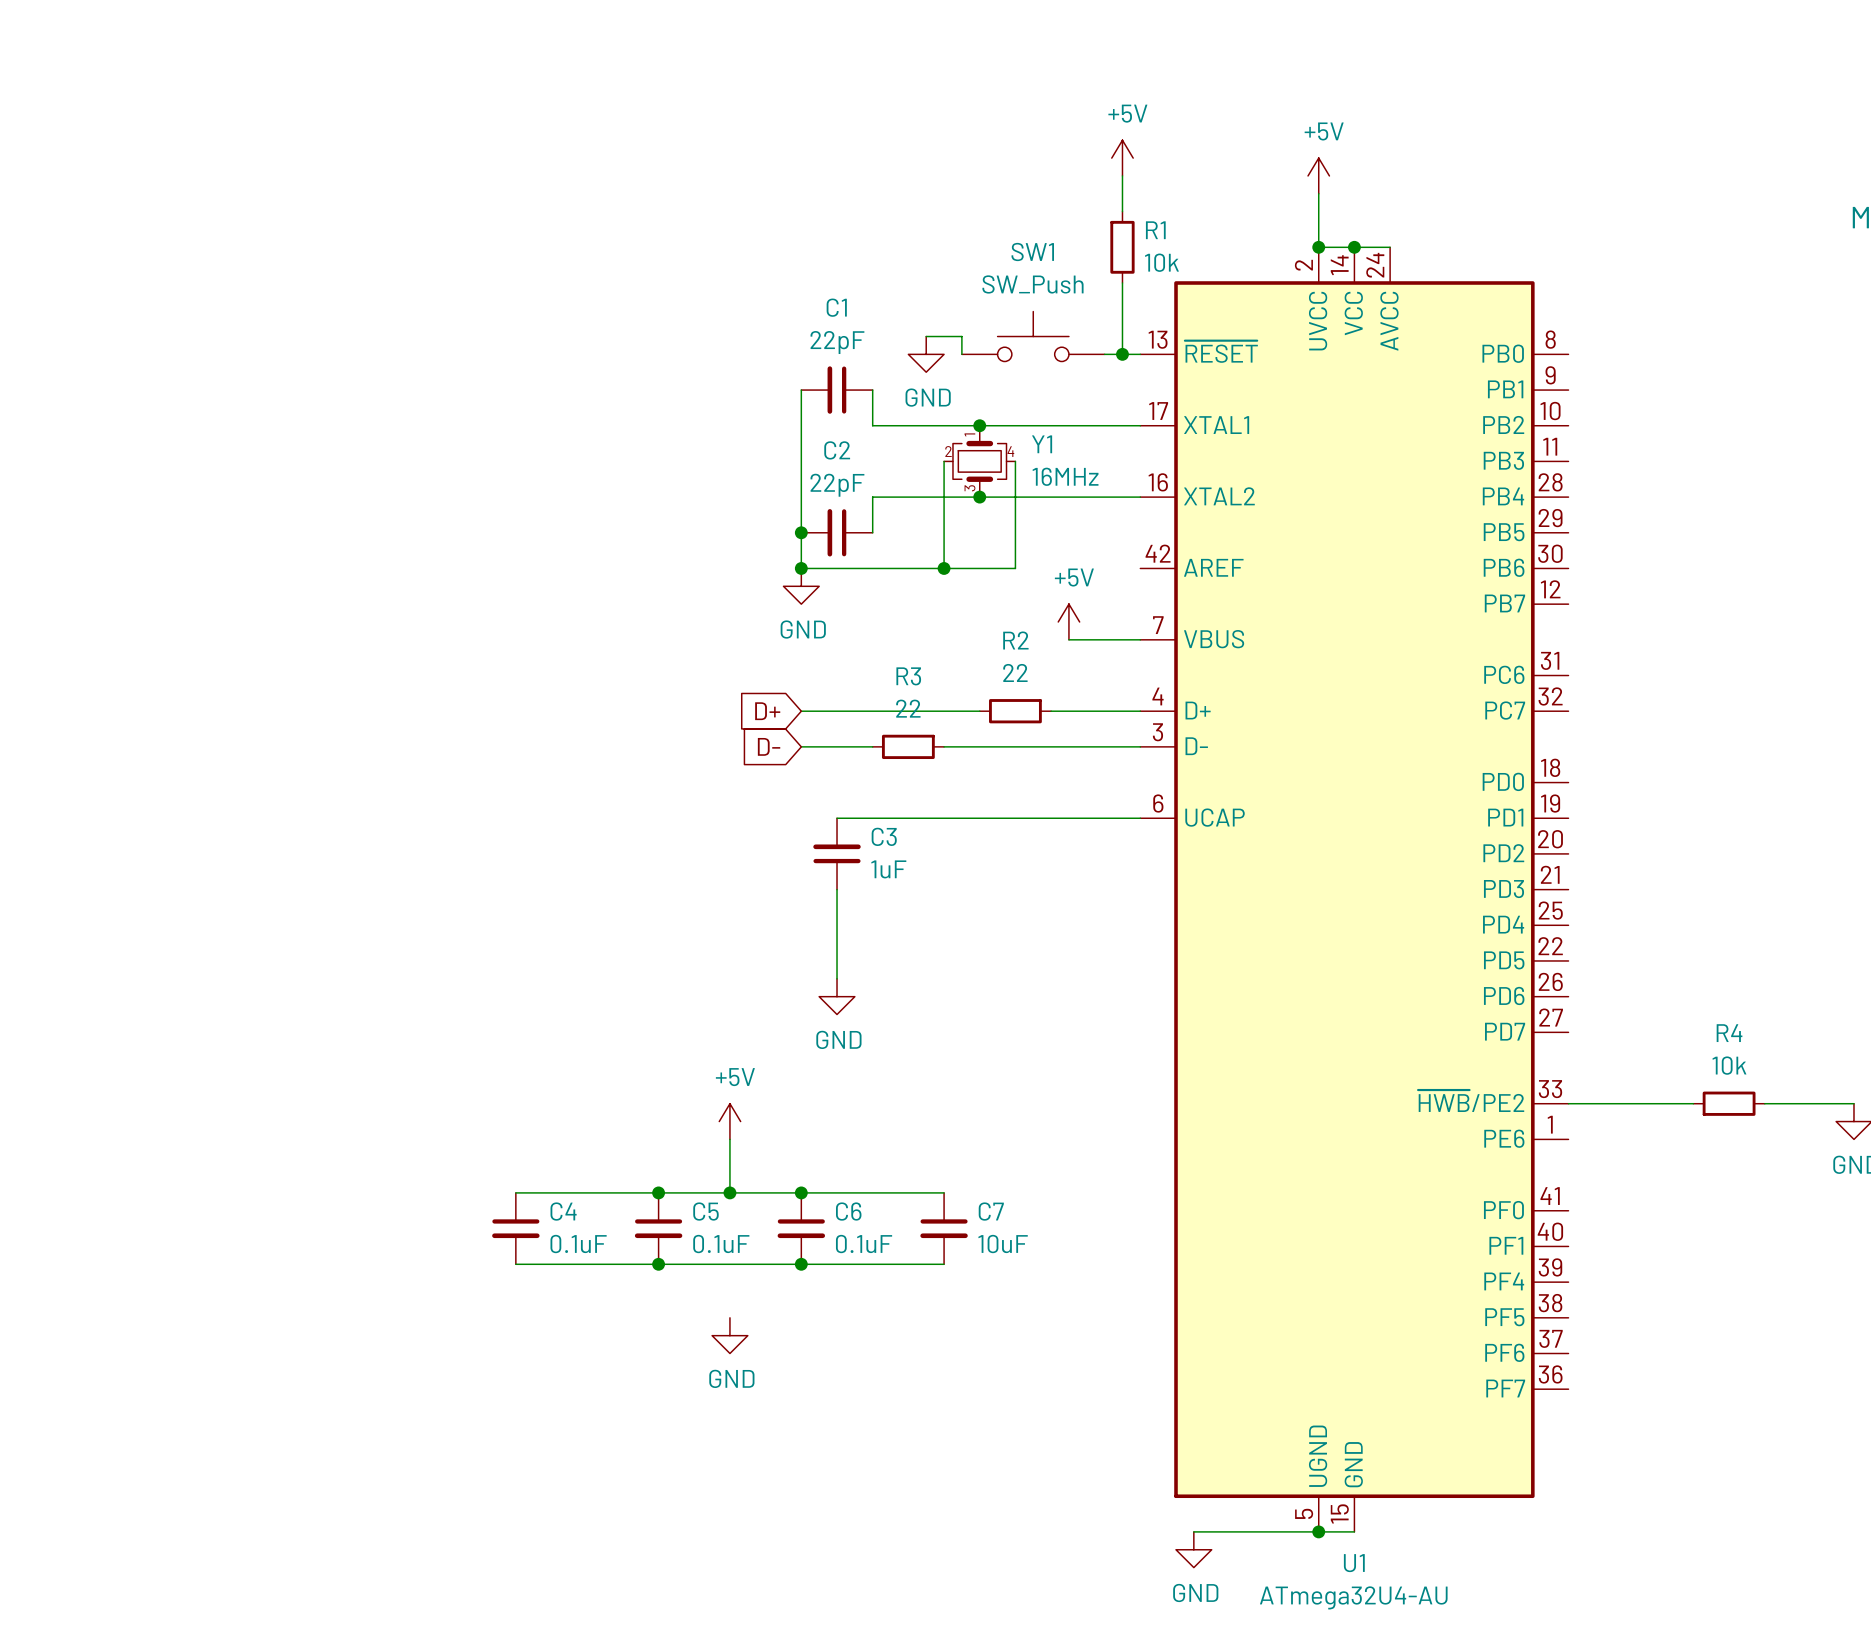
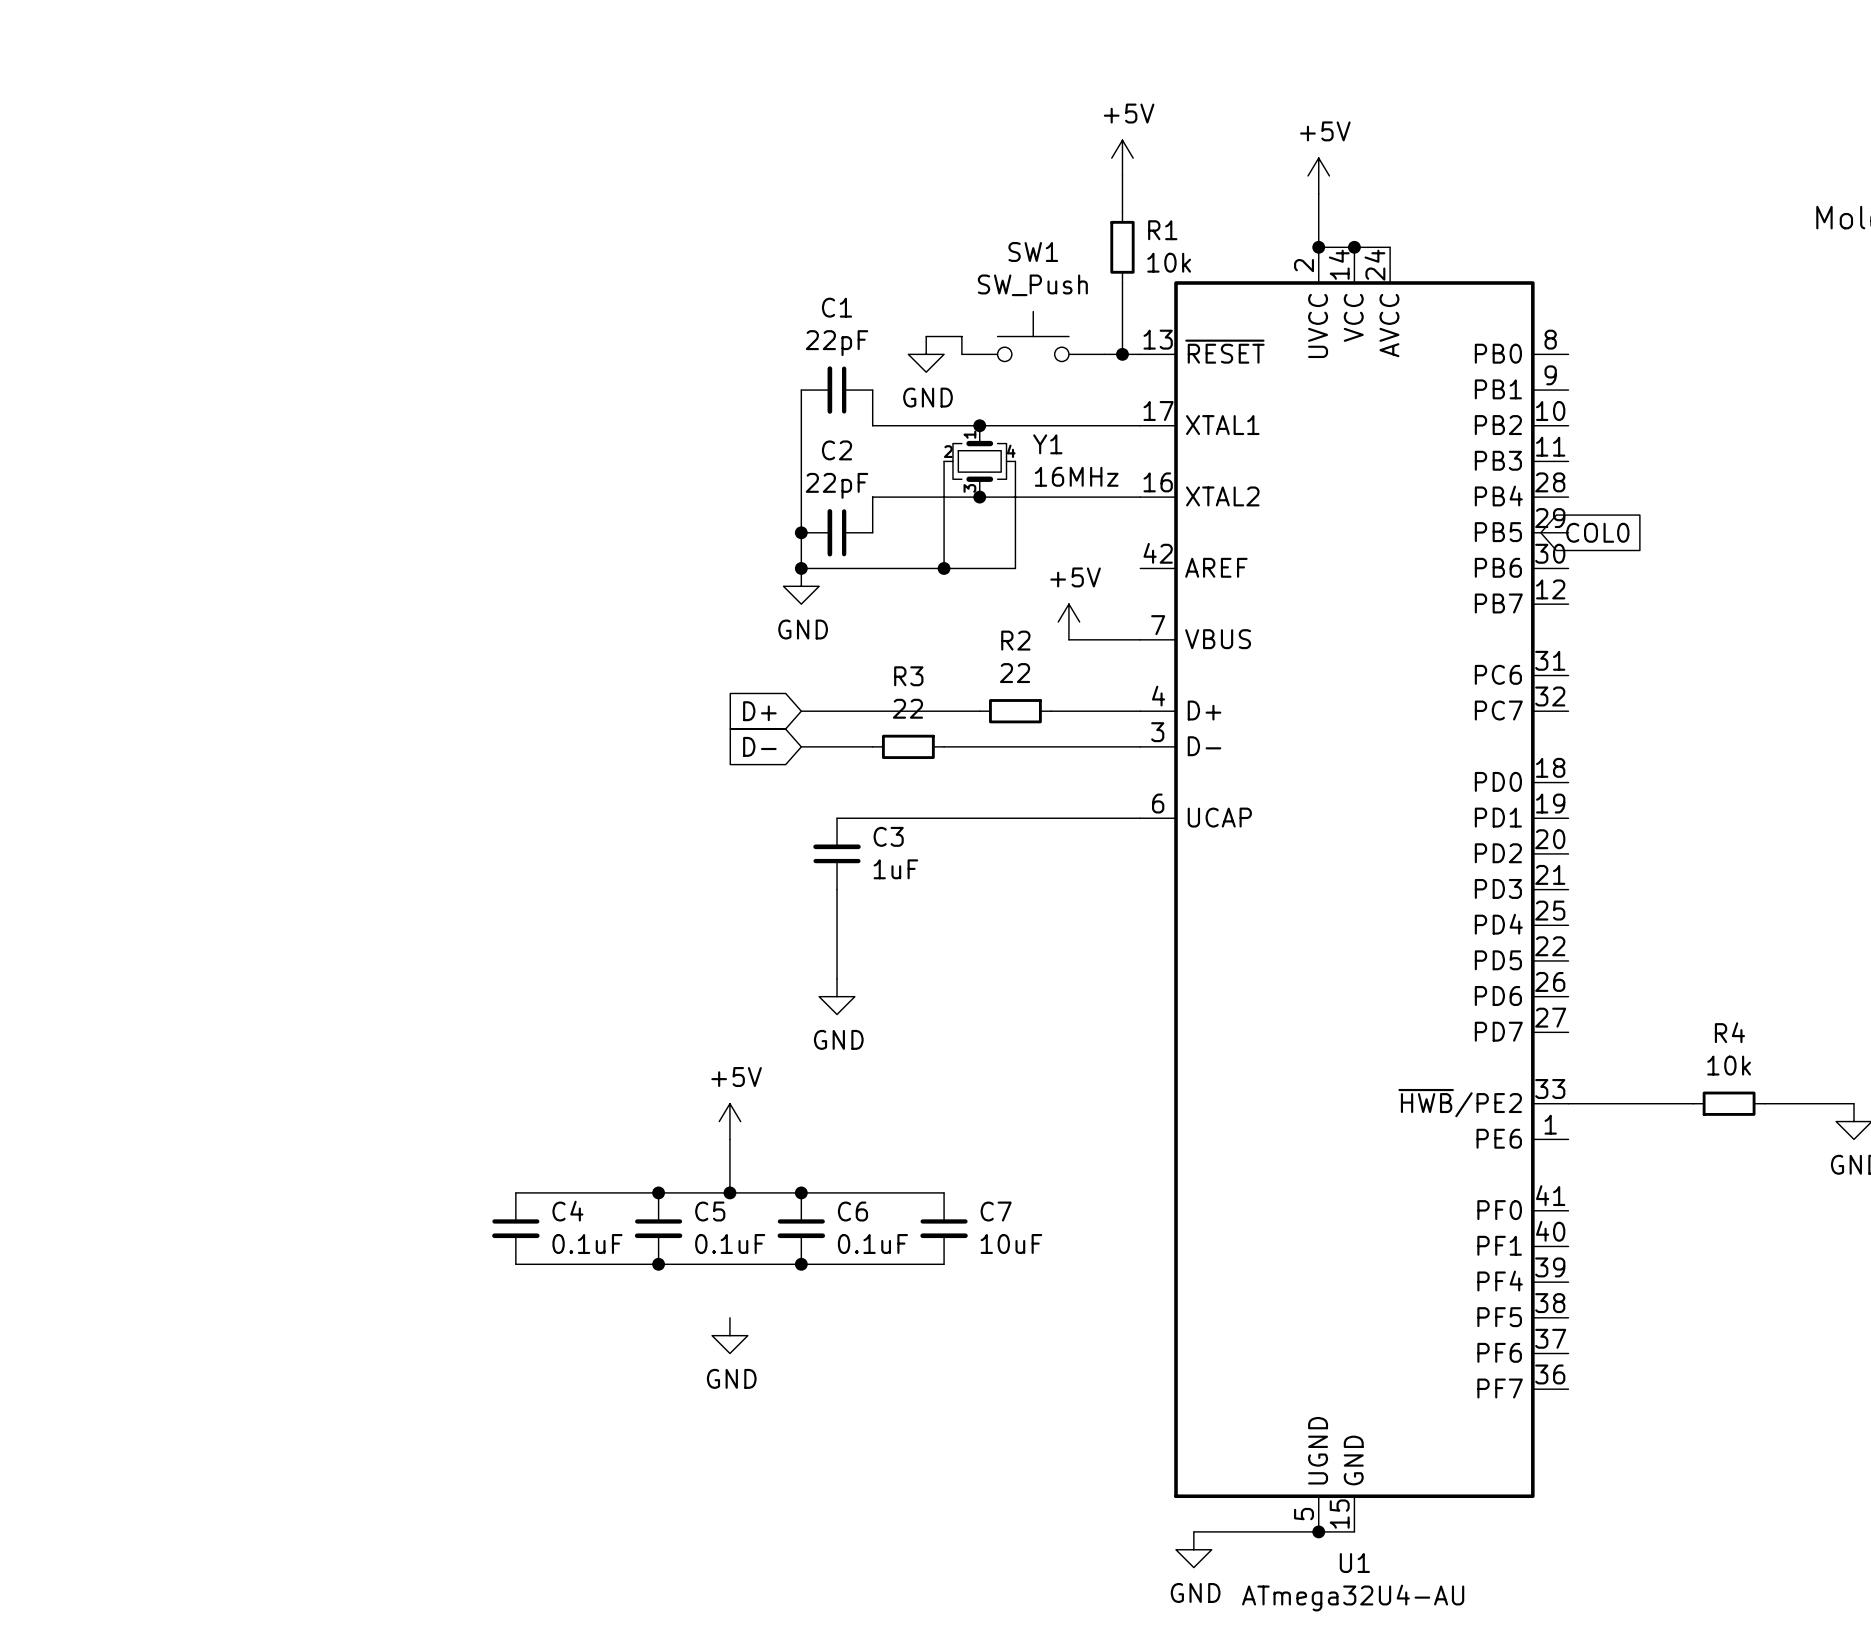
global label: none -> COL0 (1597, 532)

